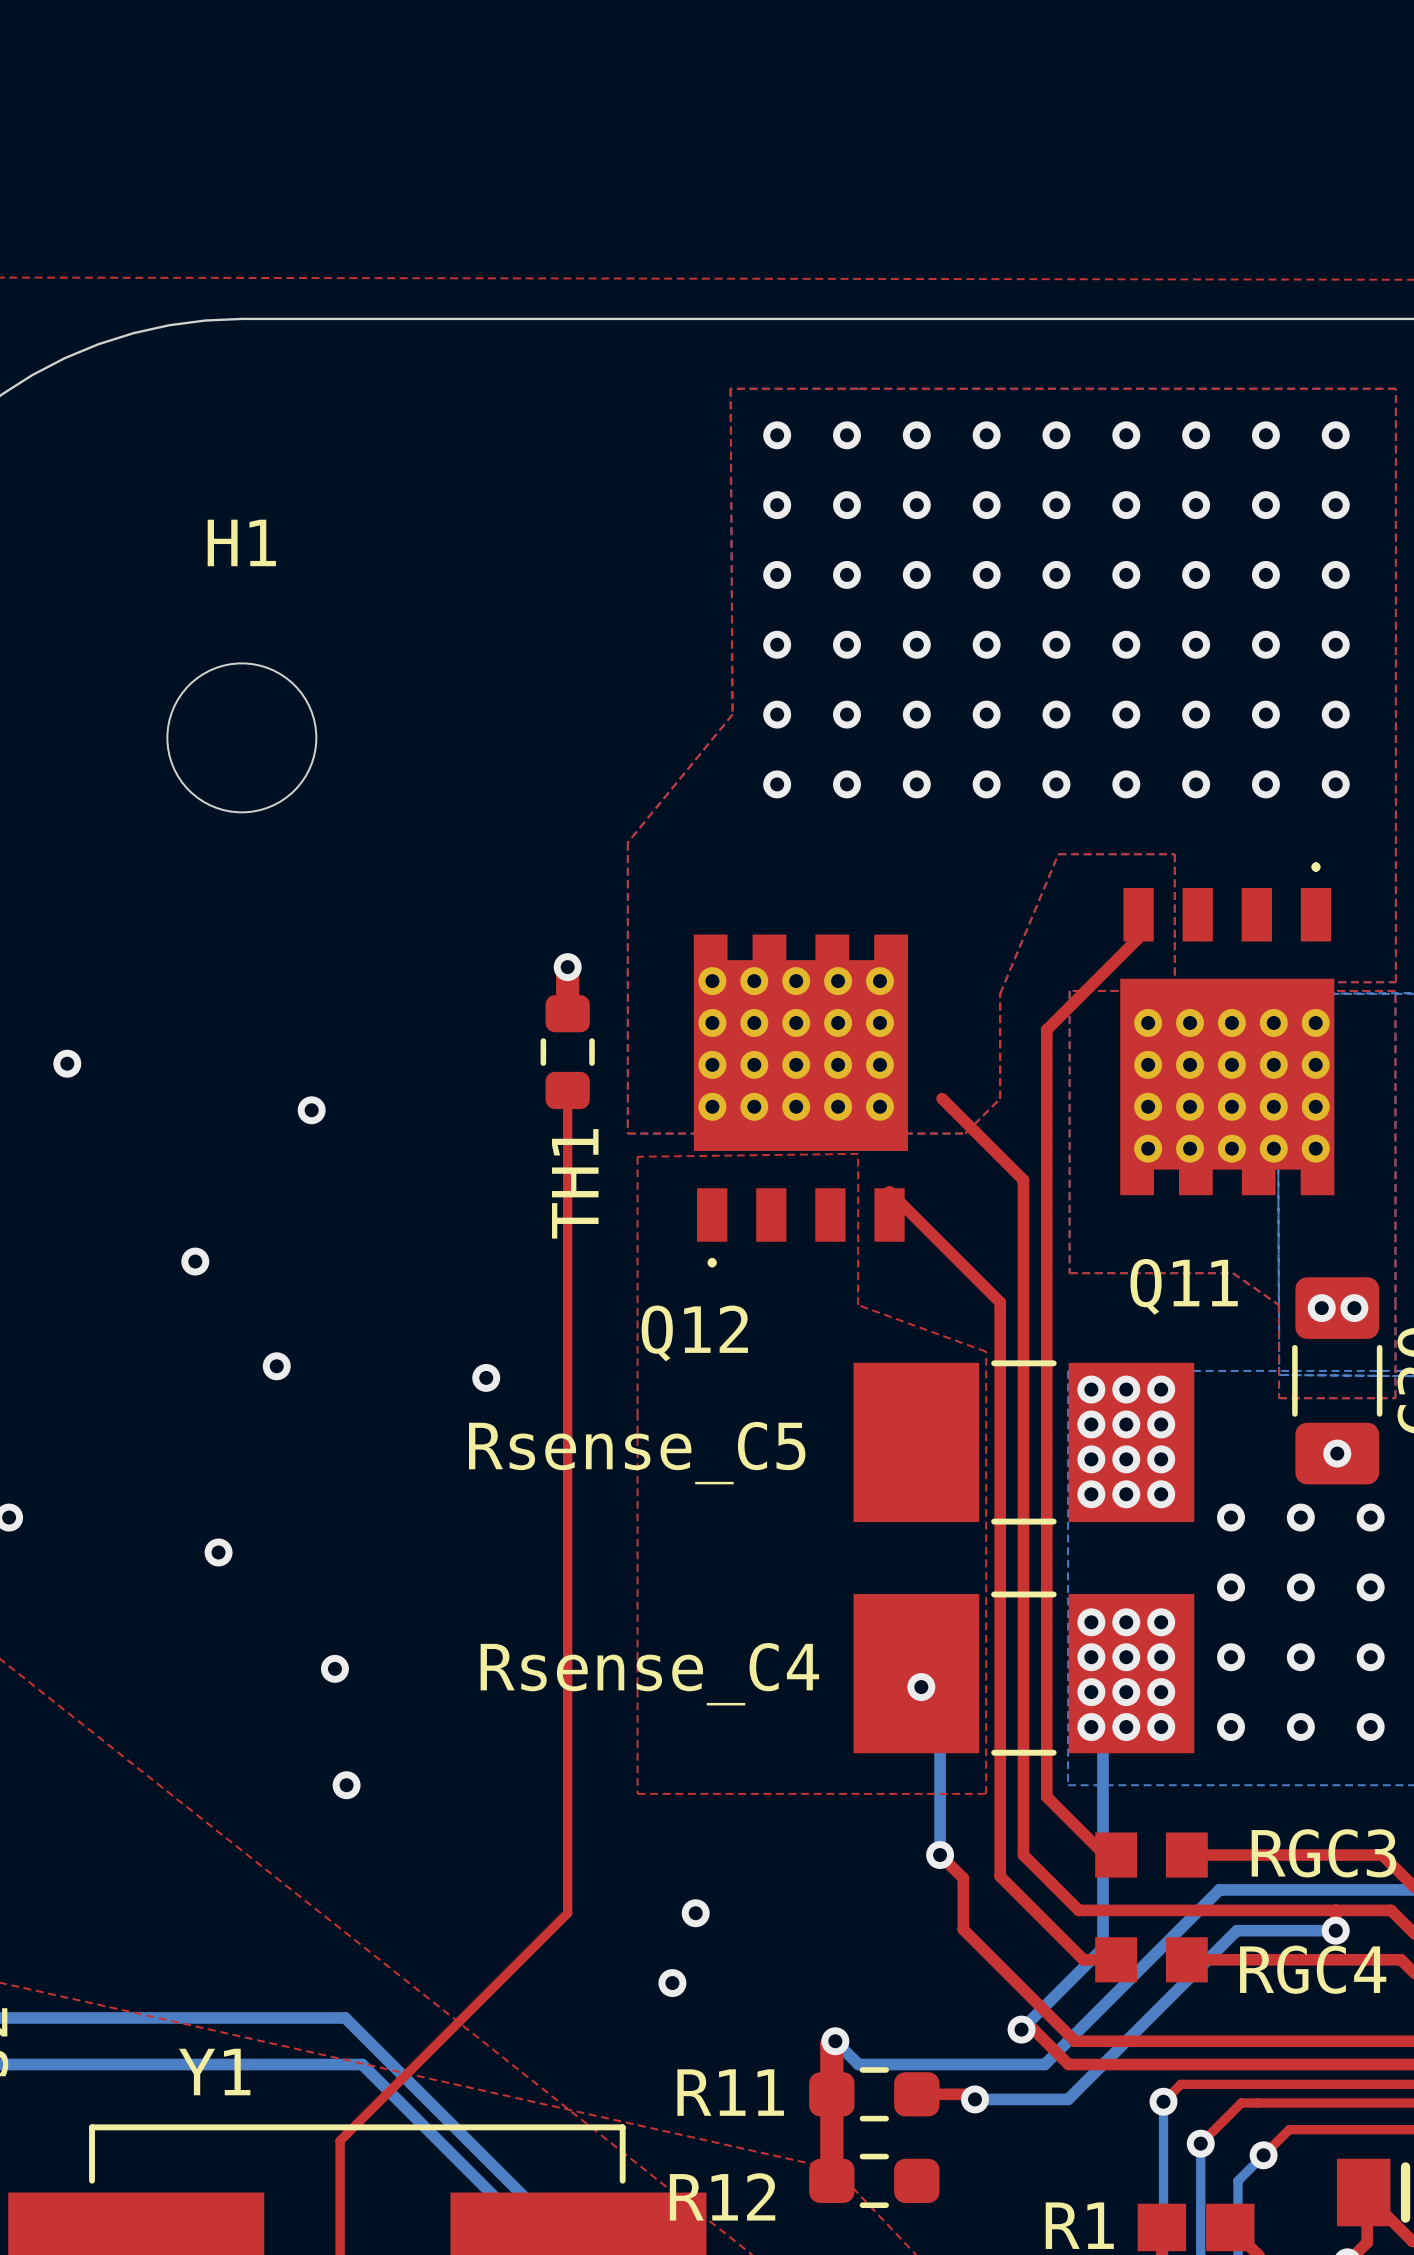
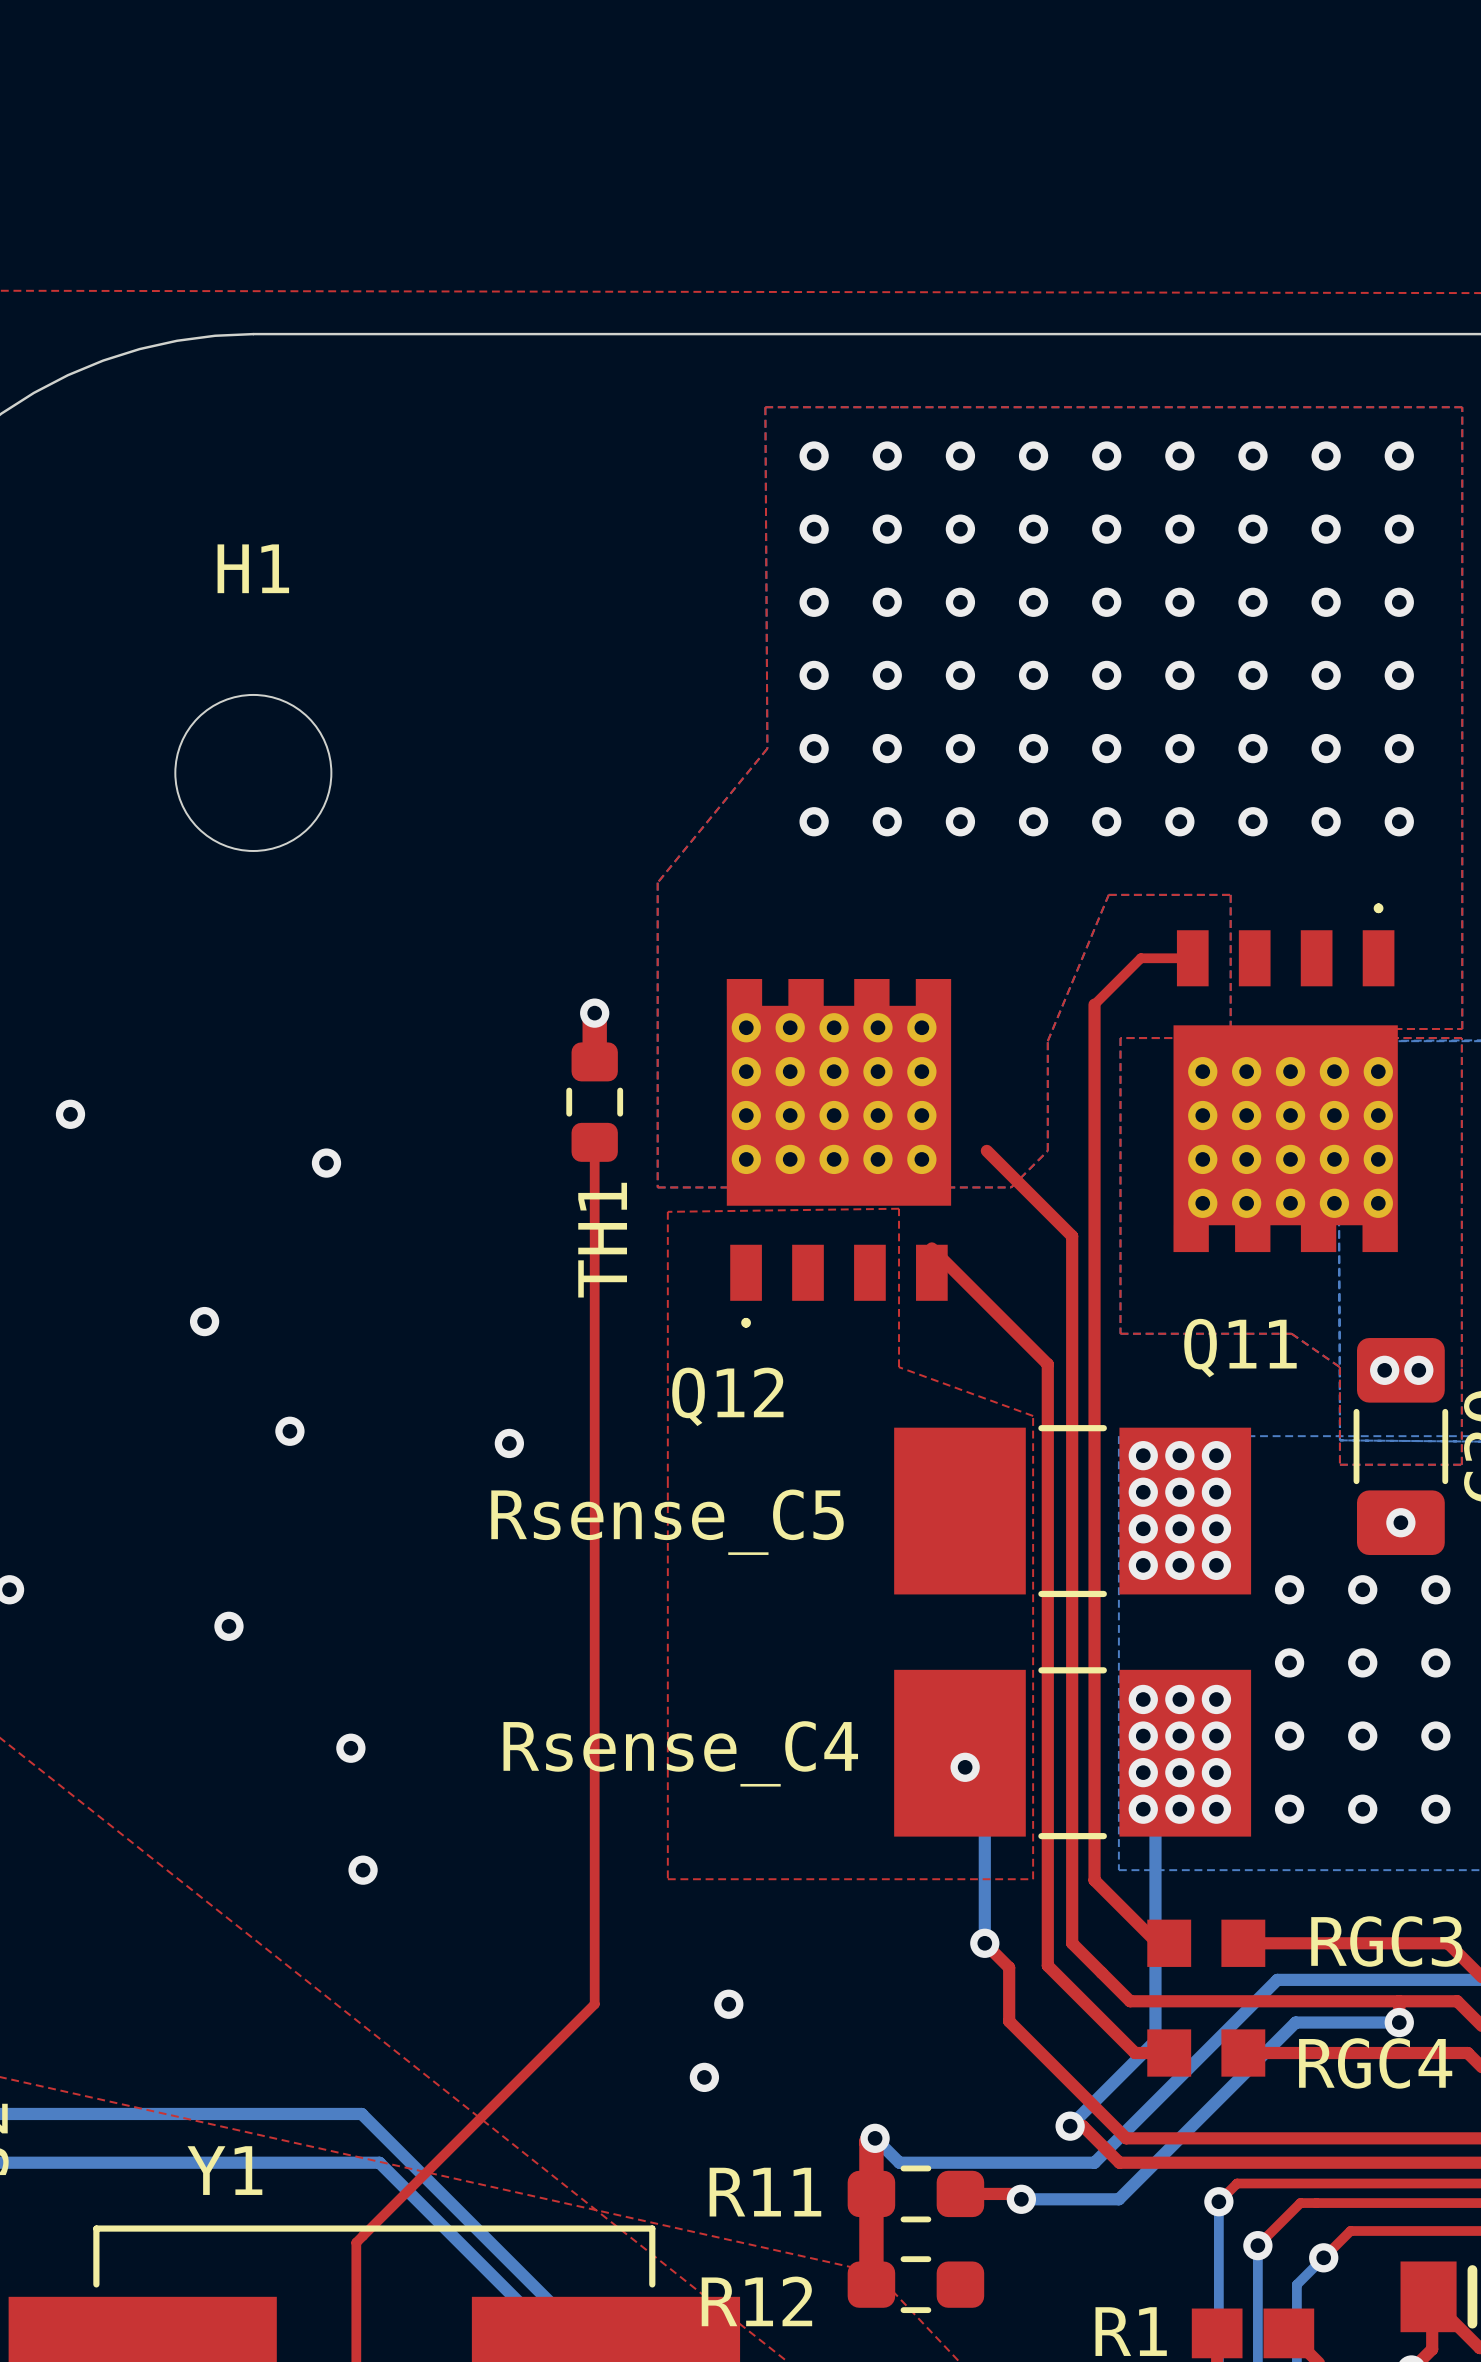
top track: (1138, 938) (1046, 1029) (1046, 1796) -> (1190, 955) (1192, 958) (1140, 958) (1094, 1004) (1094, 1880) (1096, 1882)

